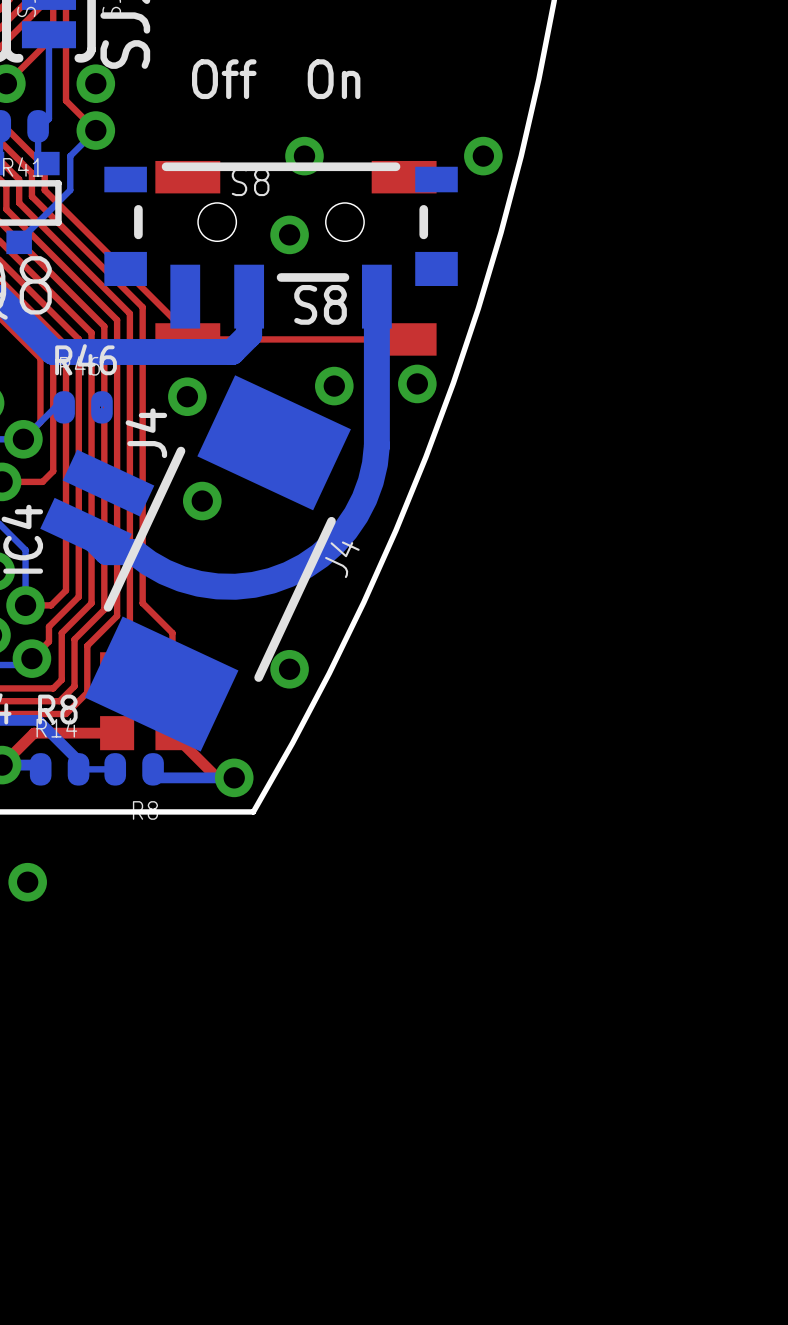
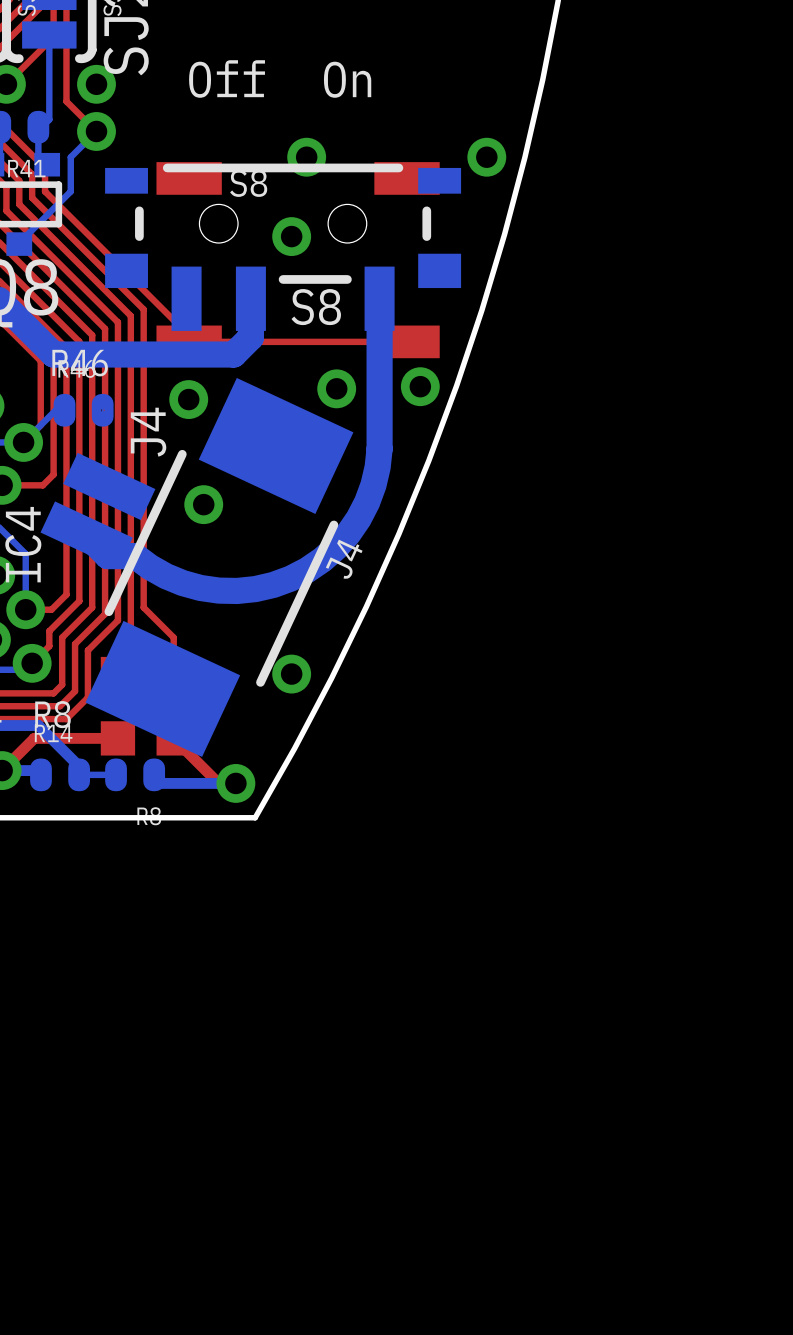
via: (27, 882) -> none

